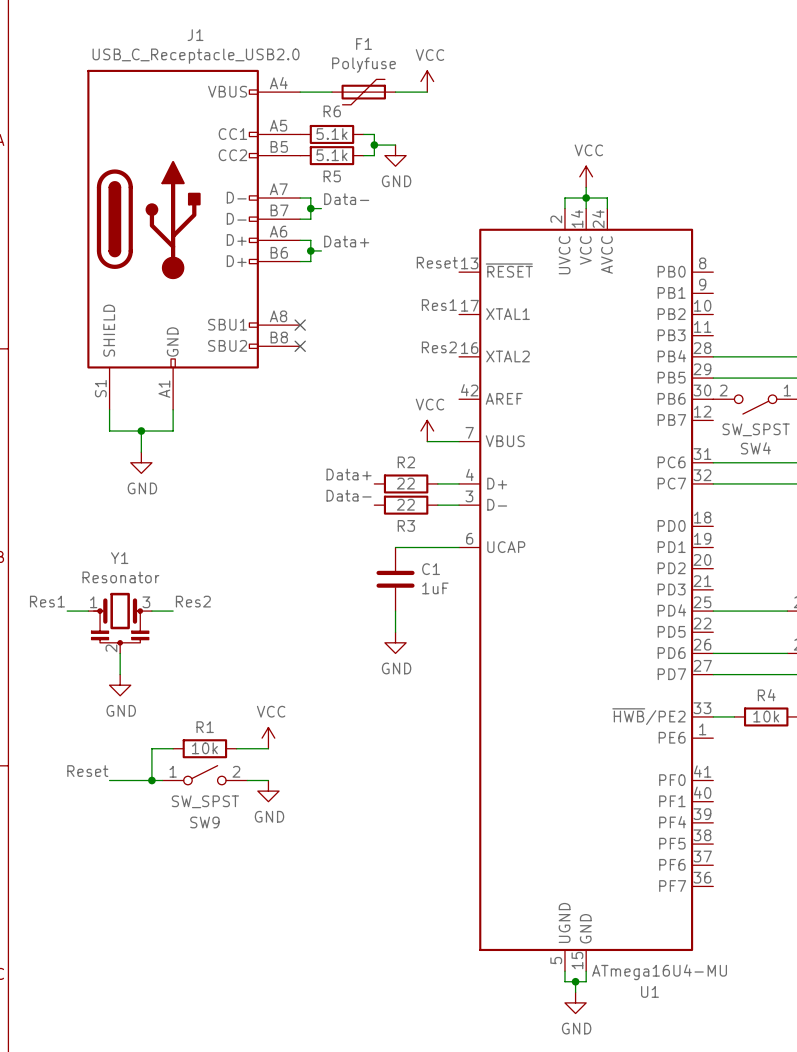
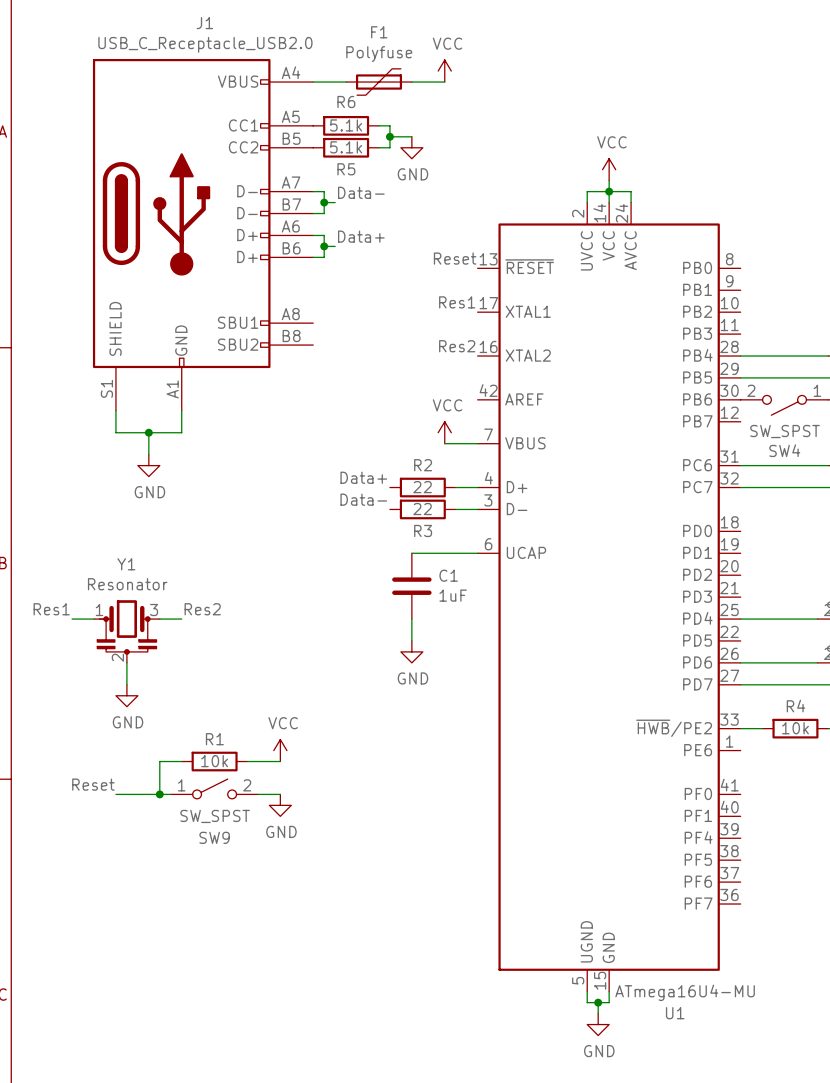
no-connect mark: (300, 325) -> none
no-connect mark: (300, 346) -> none

